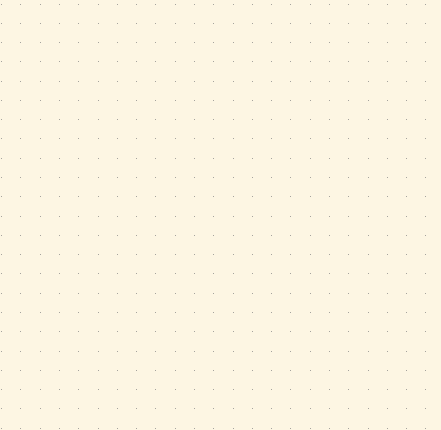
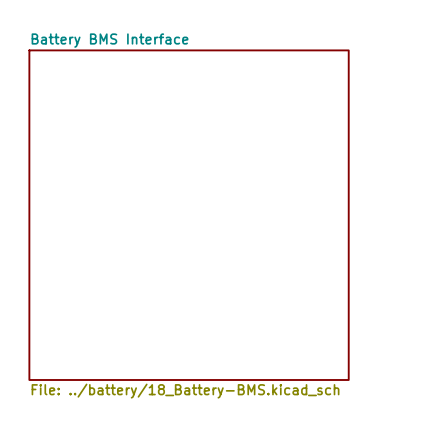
sheet Battery BMS Interface: none -> File: ../battery/18_Battery-BMS.kicad_sch (189, 215)

